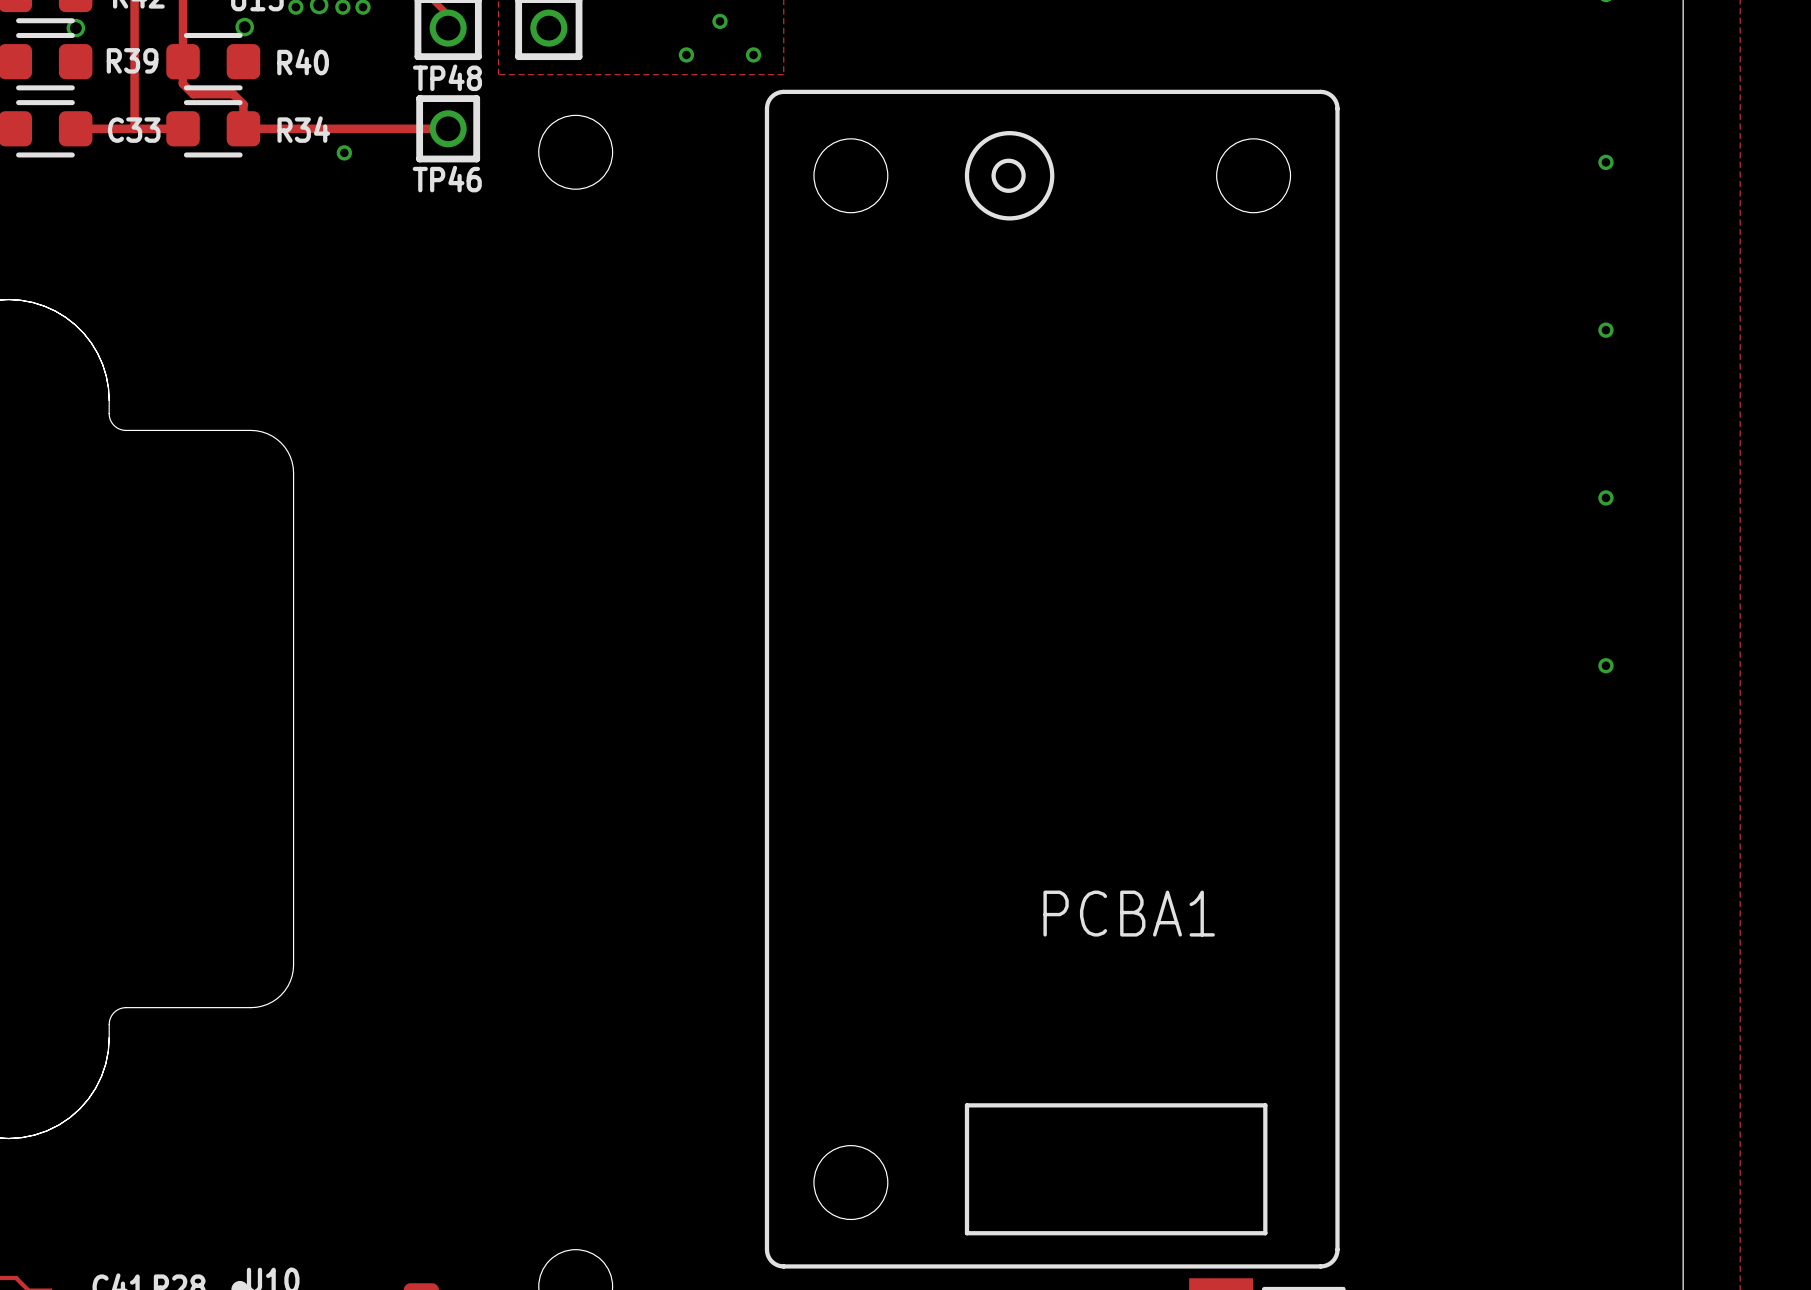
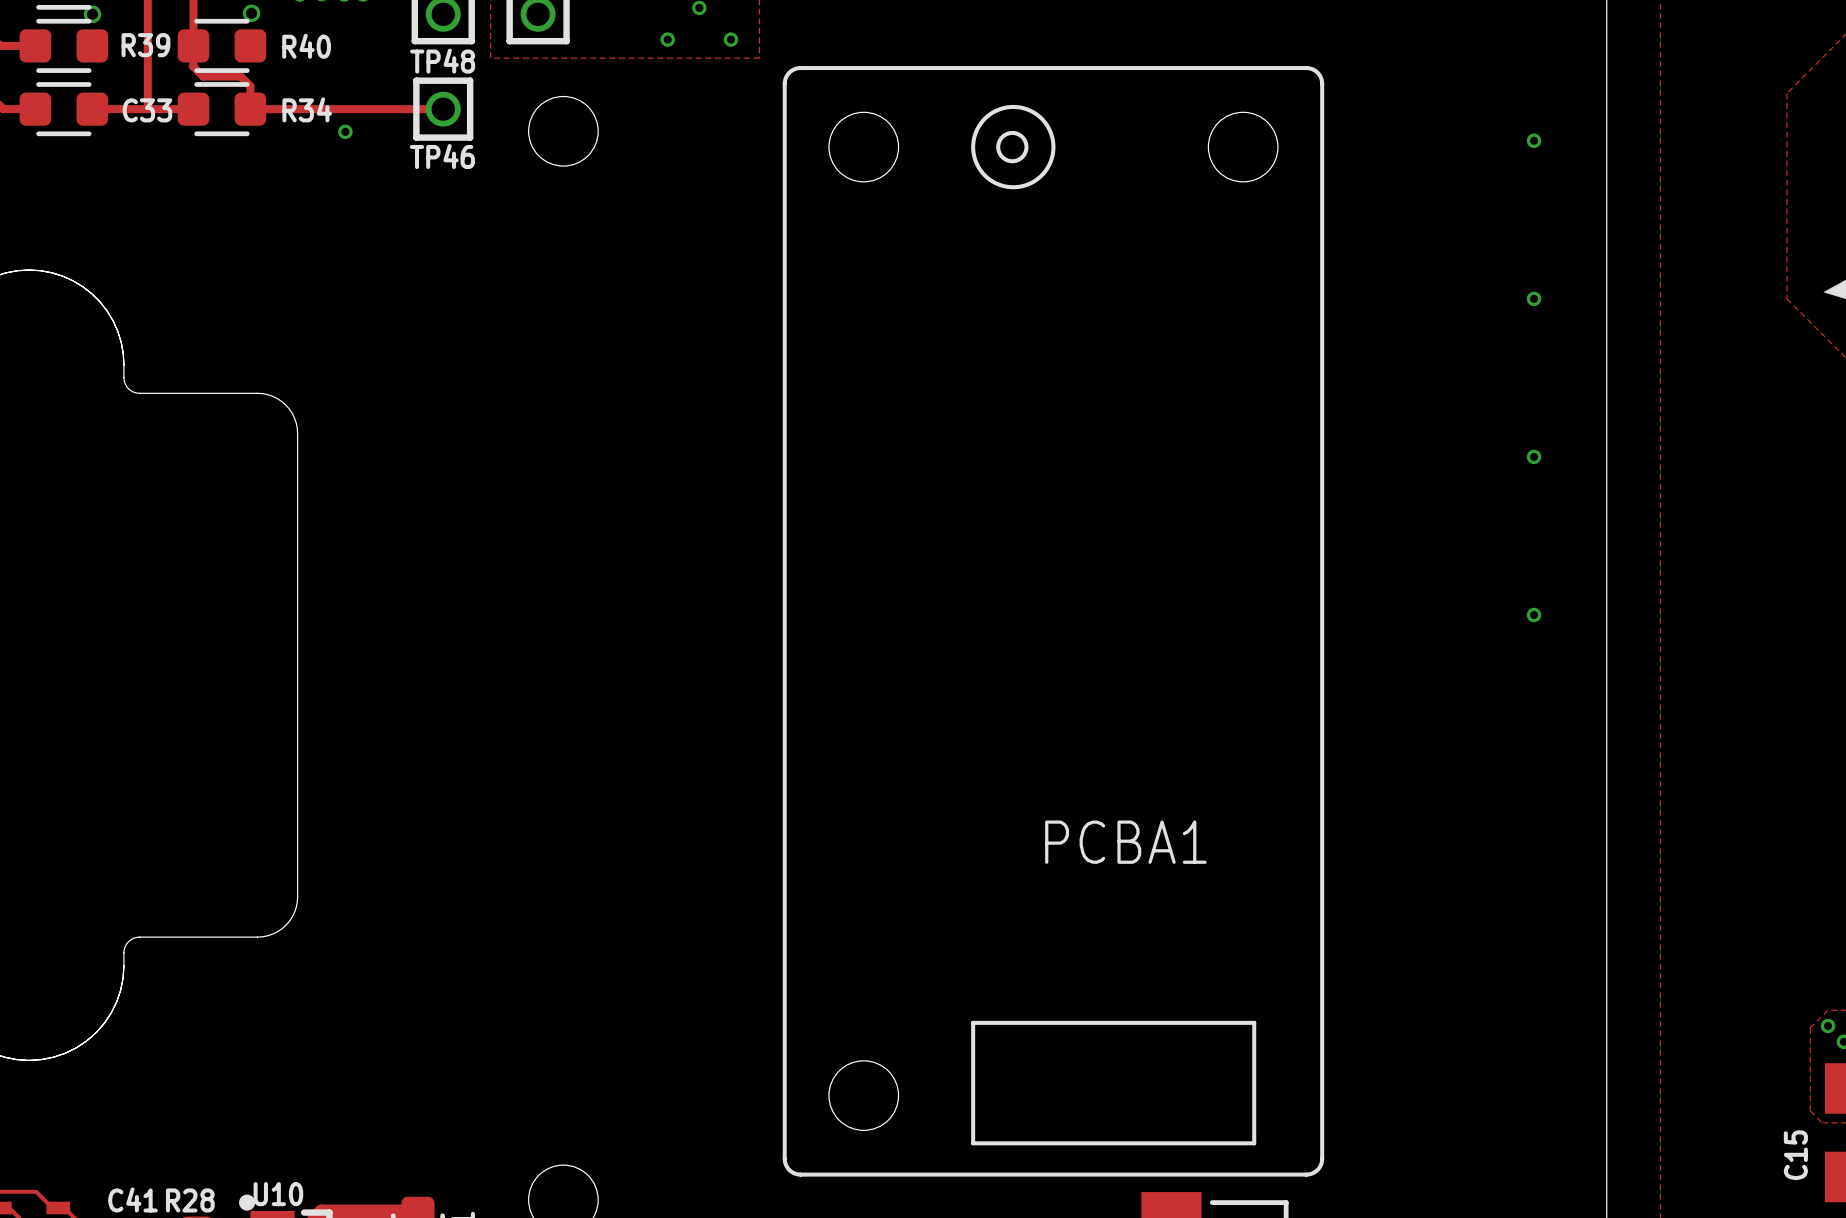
PCBA1 position: (1052, 679) -> (1053, 621)

